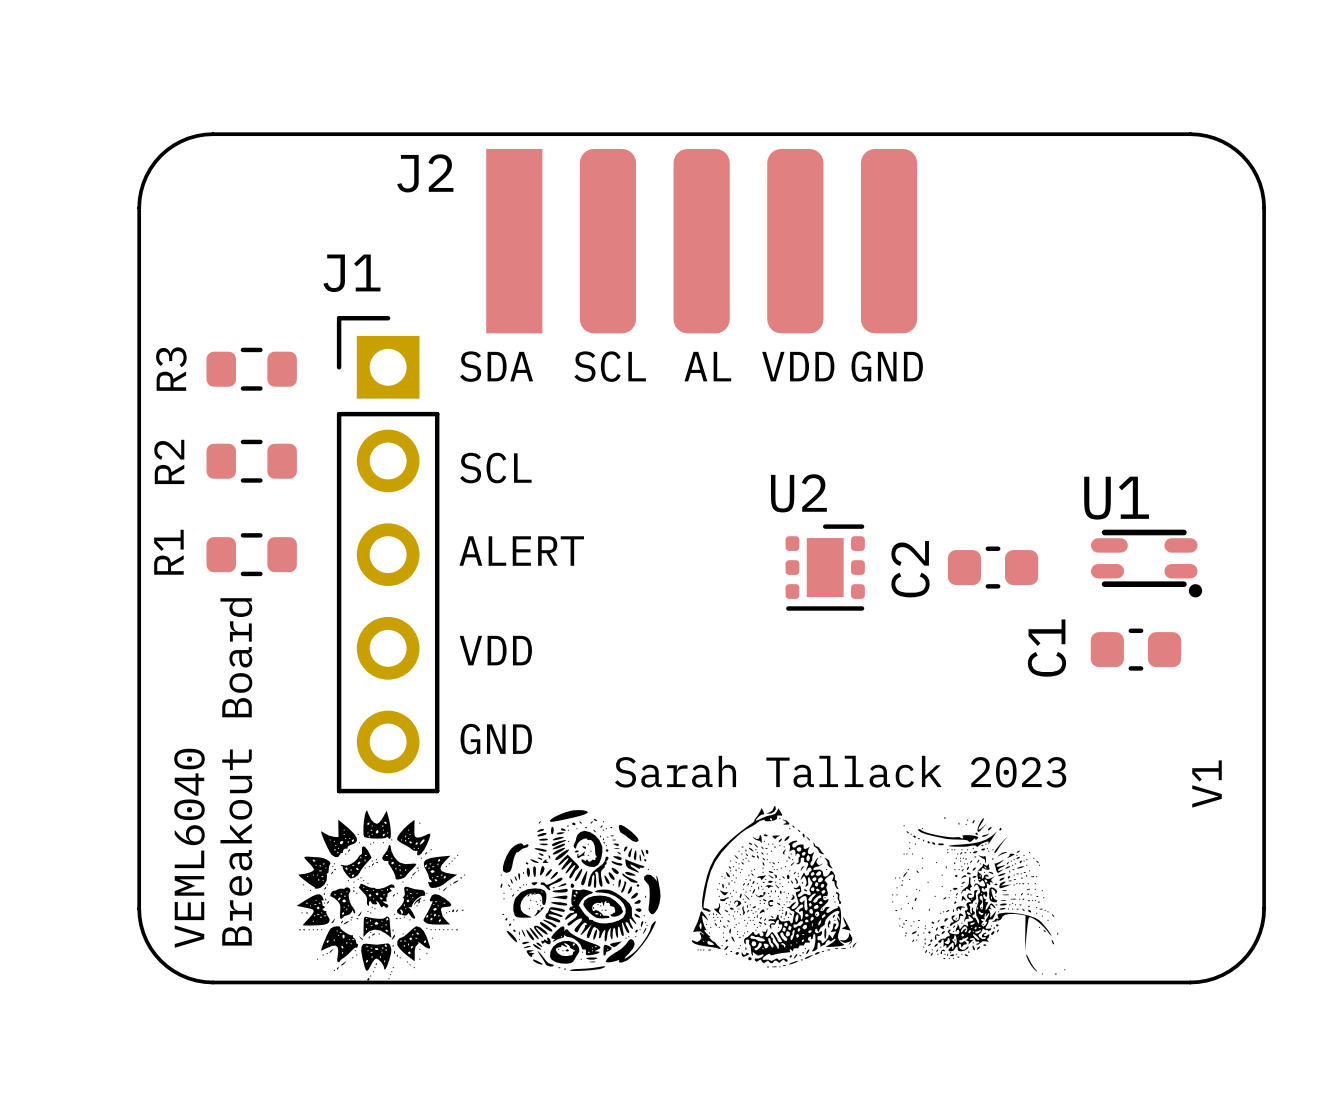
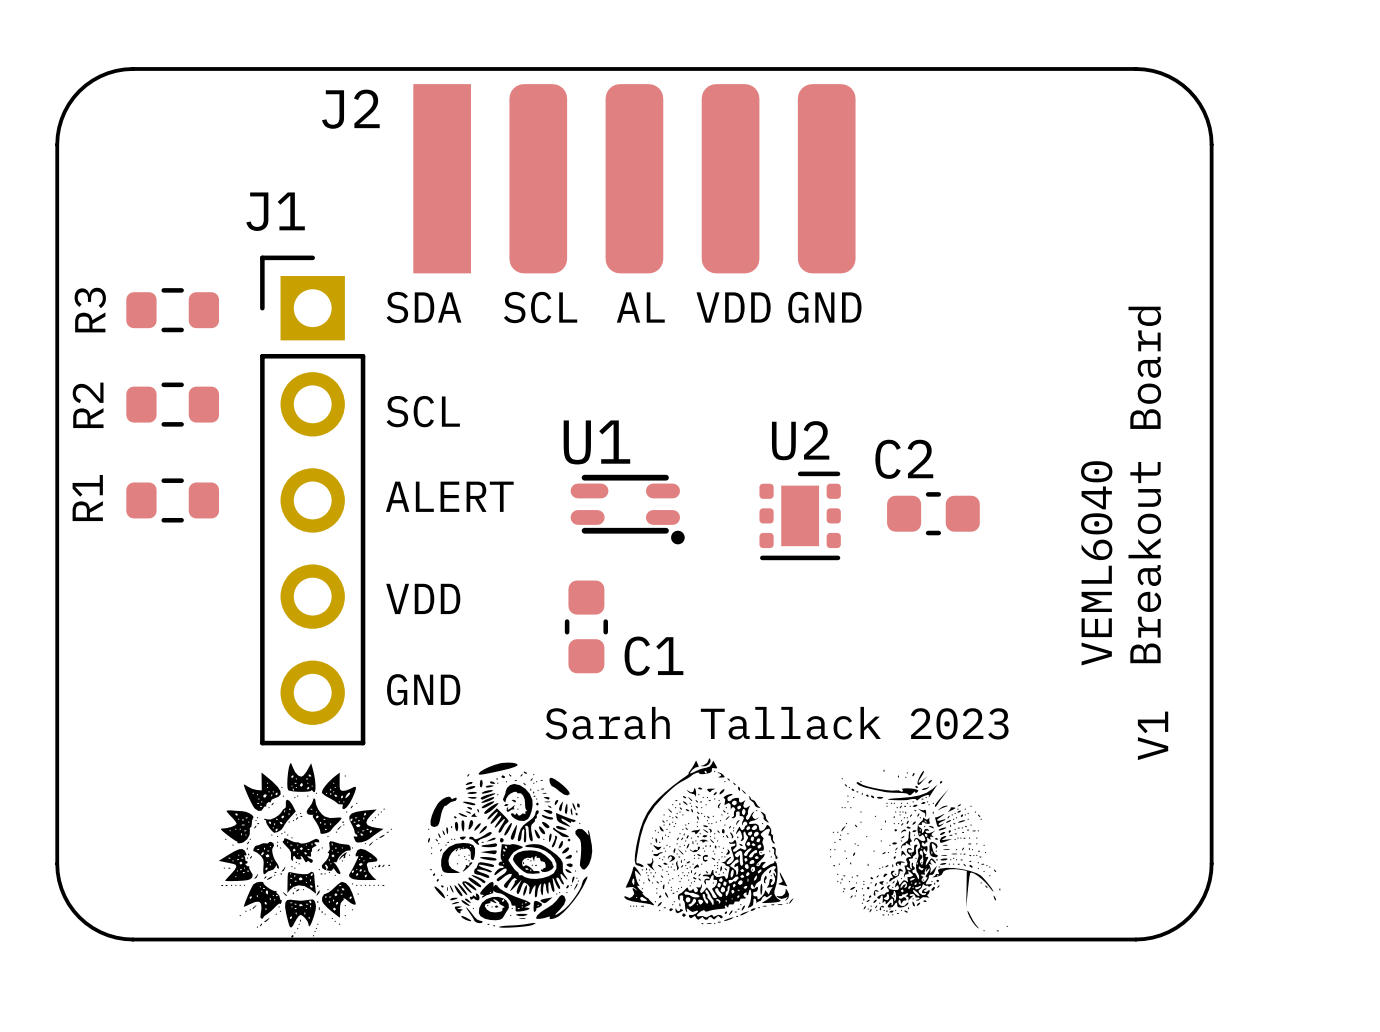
U2 name position: U2 (798, 493) -> U2 (800, 440)
text: none -> Breakout Board (1144, 484)
U1 position: (1146, 563) -> (627, 509)
U2 position: (825, 567) -> (800, 515)
C2 name rotation: 0° (910, 569) -> 90° clockwise (904, 459)
text: none -> VEML6040 (1096, 563)
C1 name position: C1 (1046, 648) -> C1 (653, 656)
C1 rotation: 0° (1135, 649) -> 90° clockwise (586, 626)
C1 position: (1135, 649) -> (586, 626)
text: Breakout Board (236, 771) -> none
text: VEML6040 (189, 848) -> none

